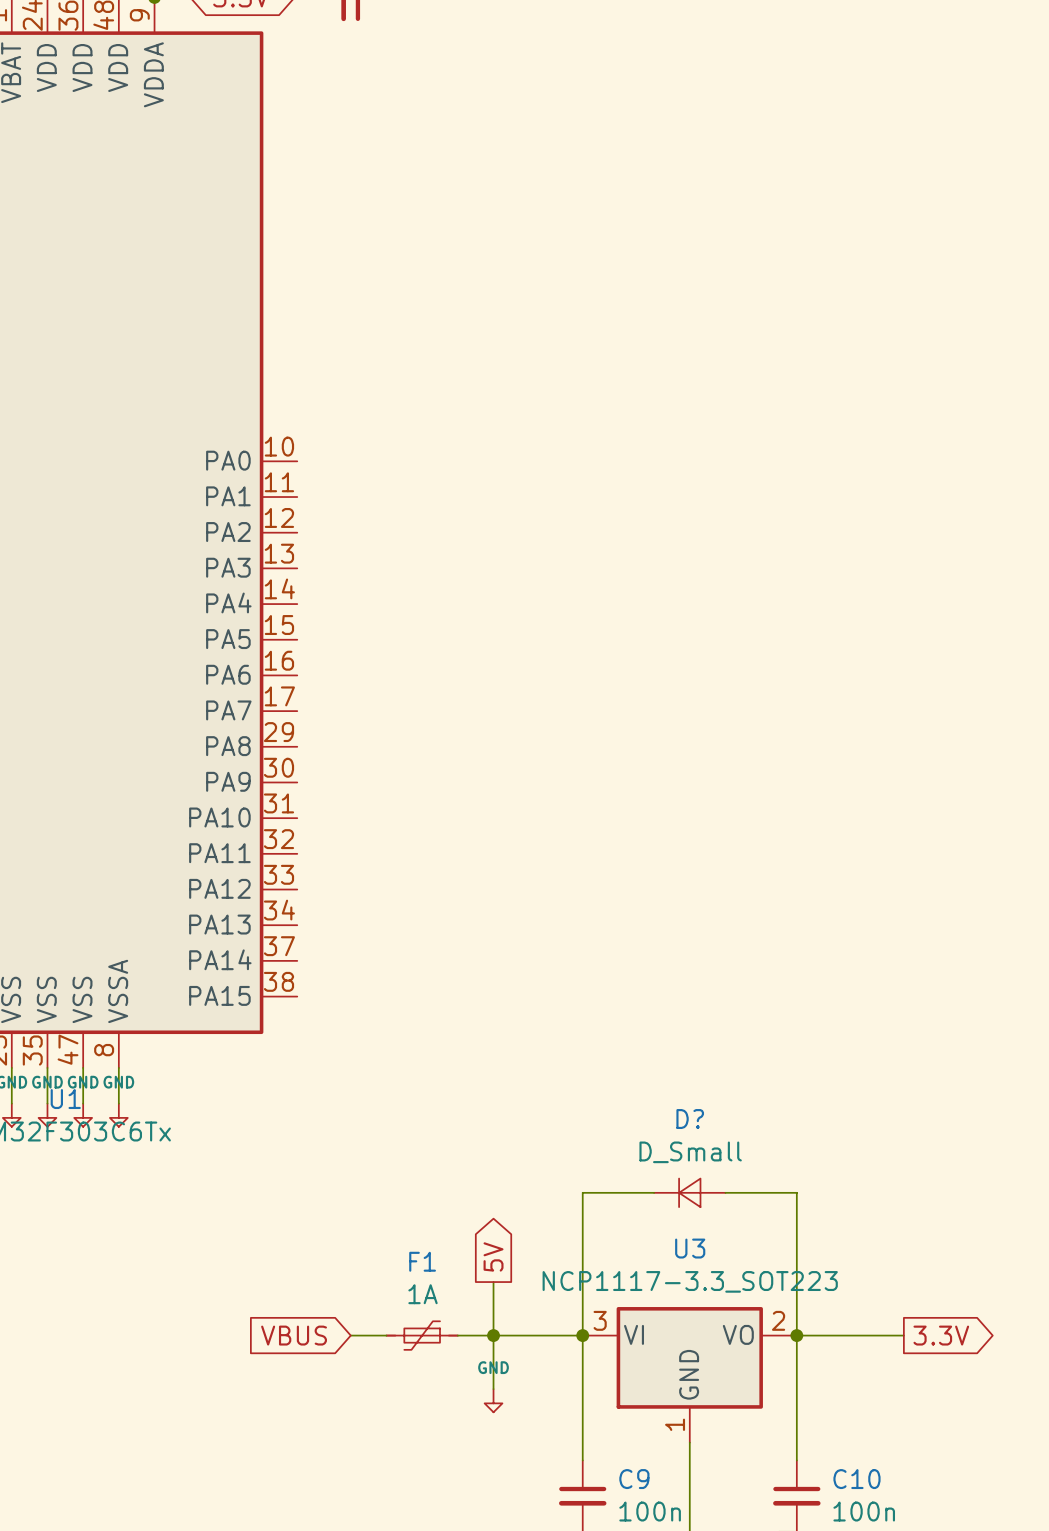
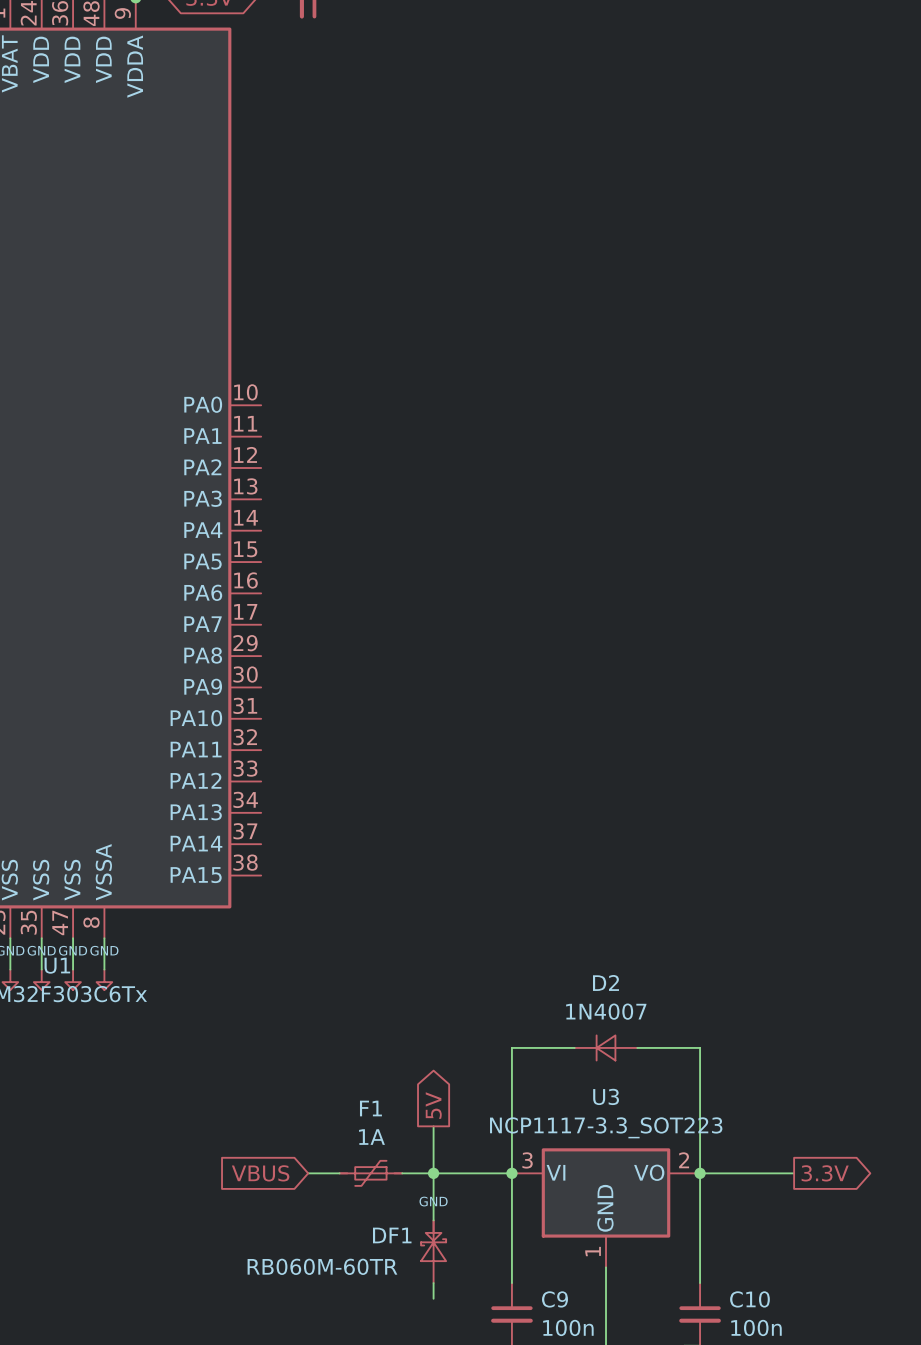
D? name: D? (690, 1119) -> D2 (605, 982)
D? value: D_Small (690, 1152) -> 1N4007 (606, 1011)
DF1: none -> RB060M-60TR (433, 1251)
wire: none -> (433, 1283) (433, 1298)

